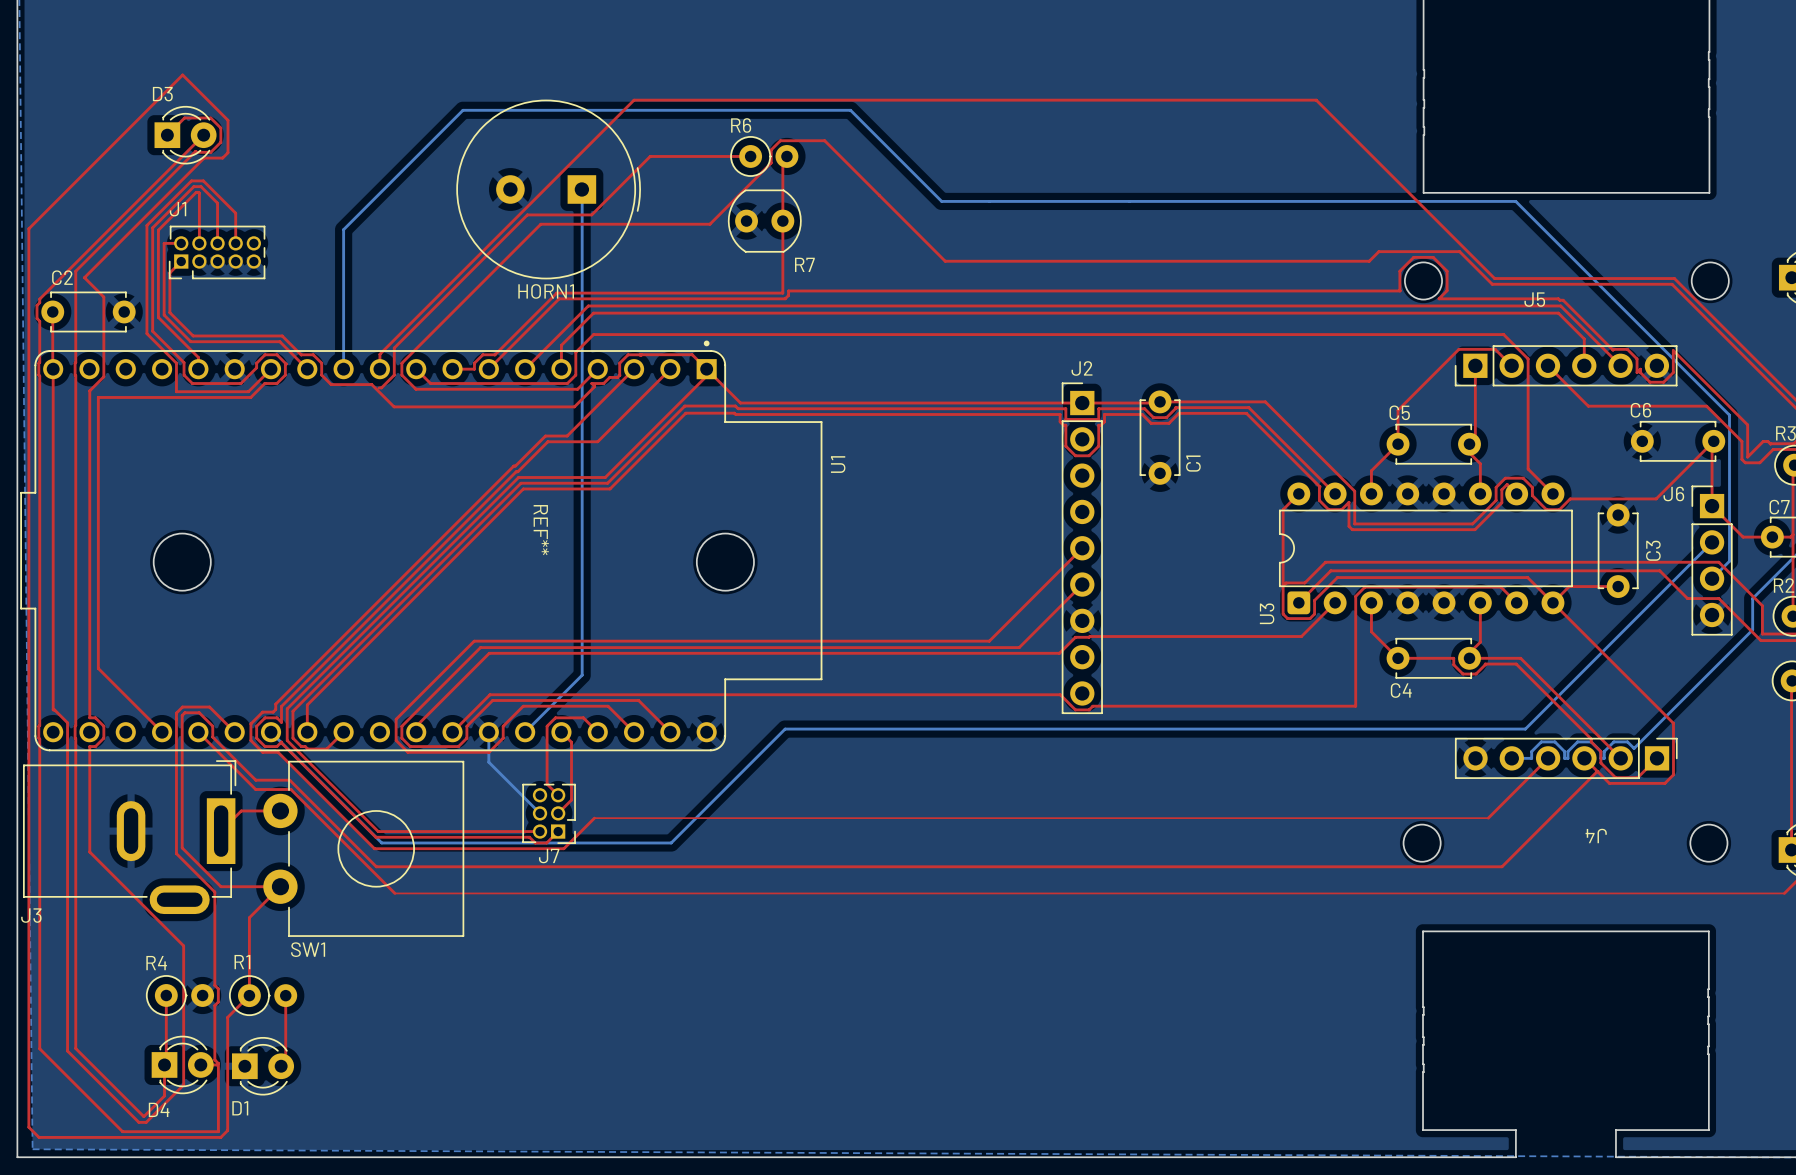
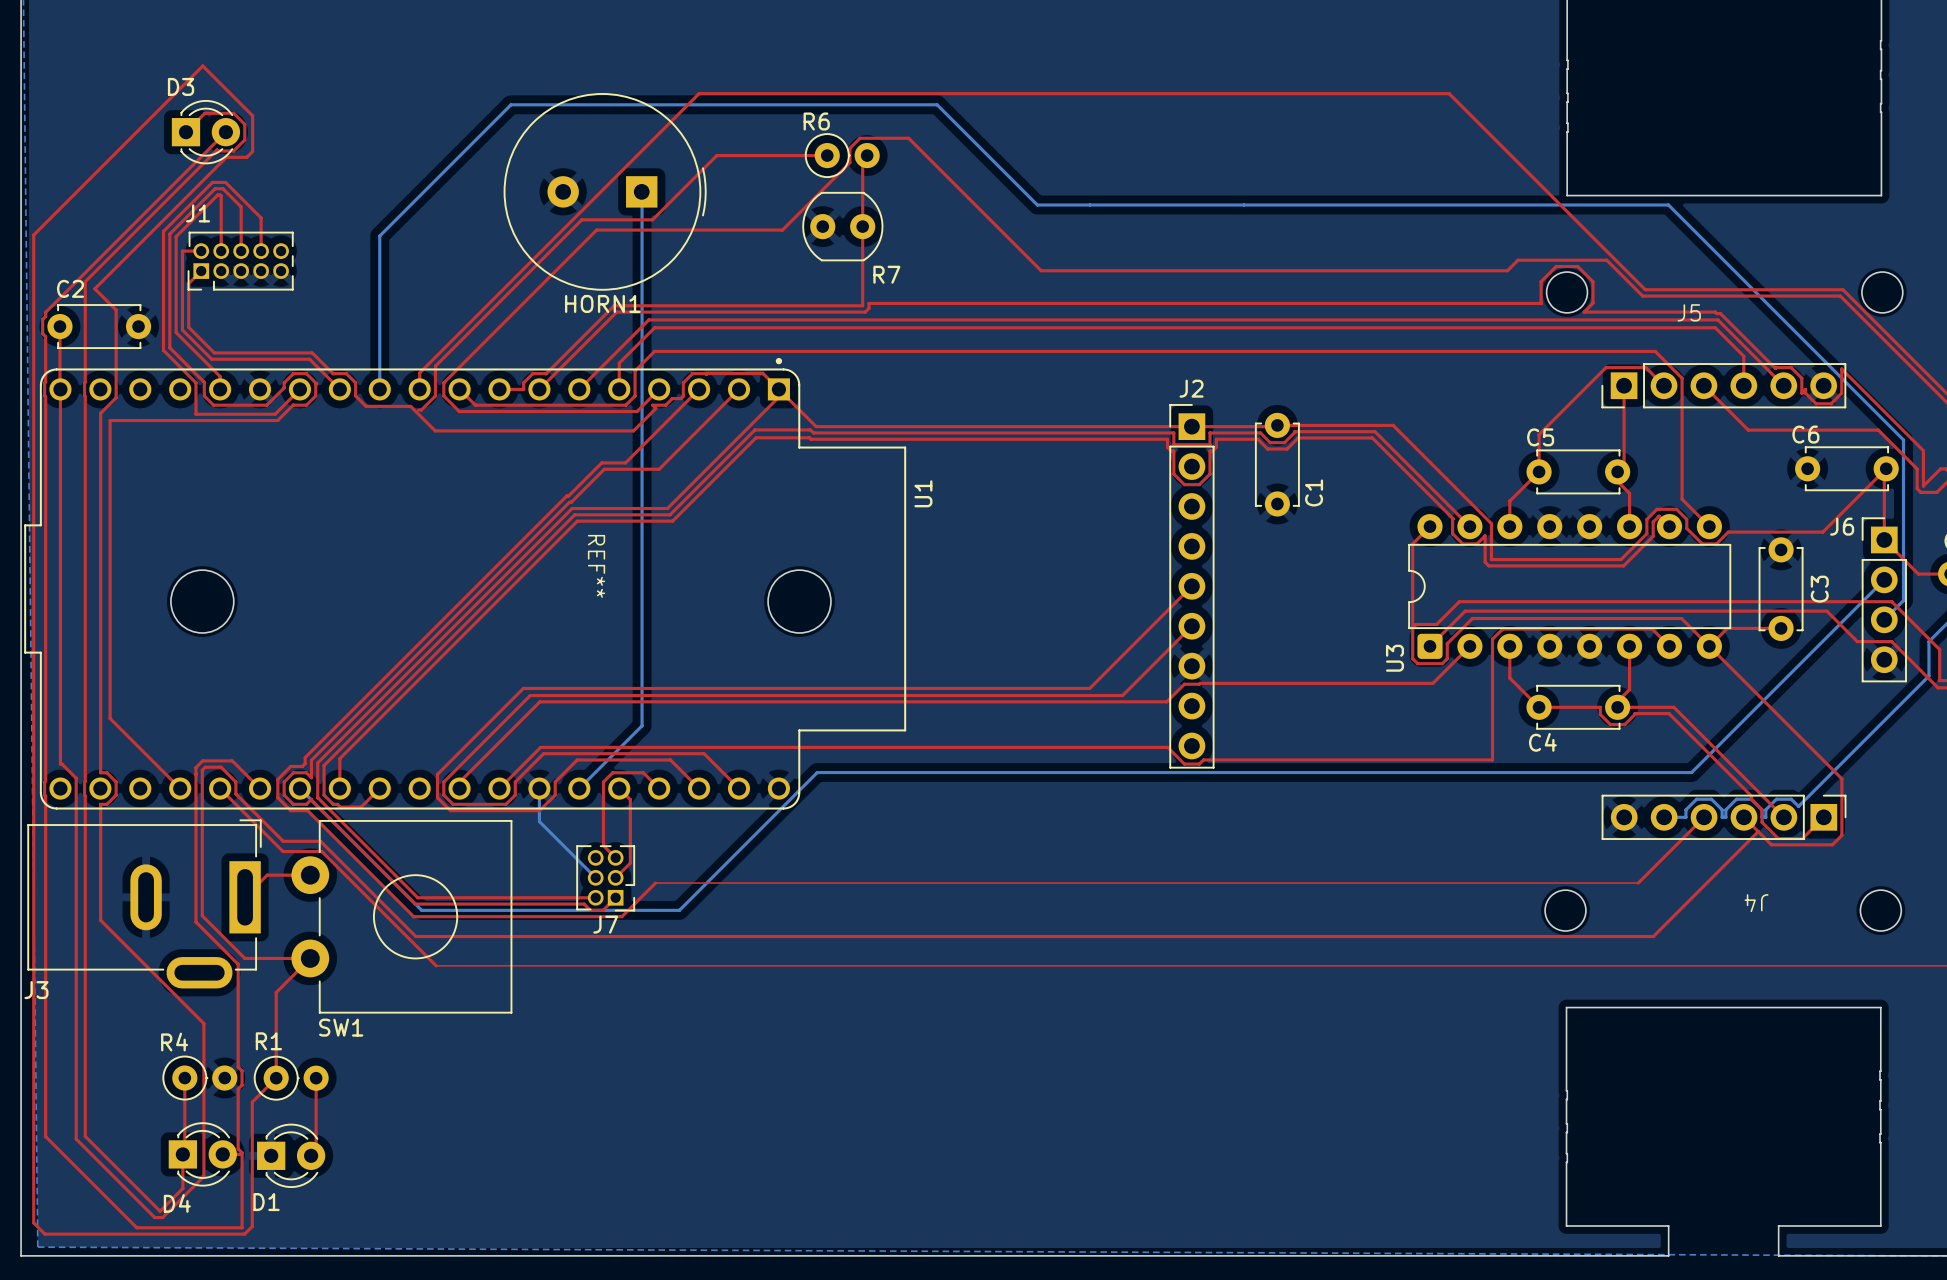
bottom track: (1536, 717) (1525, 729) (785, 729) (671, 842) (616, 842) -> (1691, 772) (817, 772) (679, 910)

